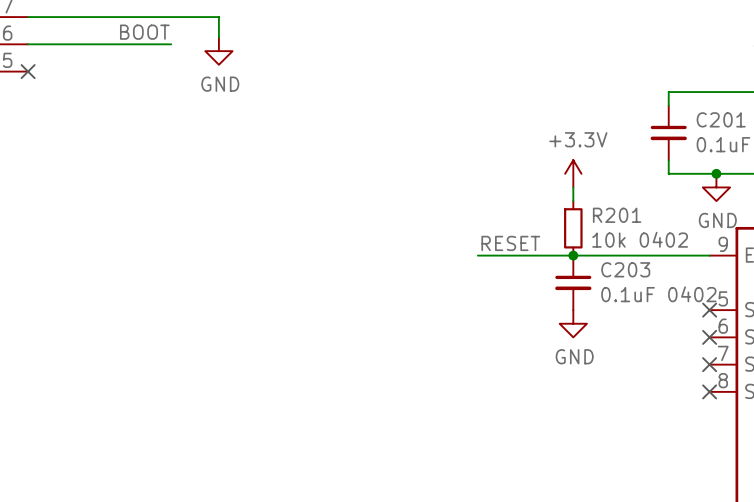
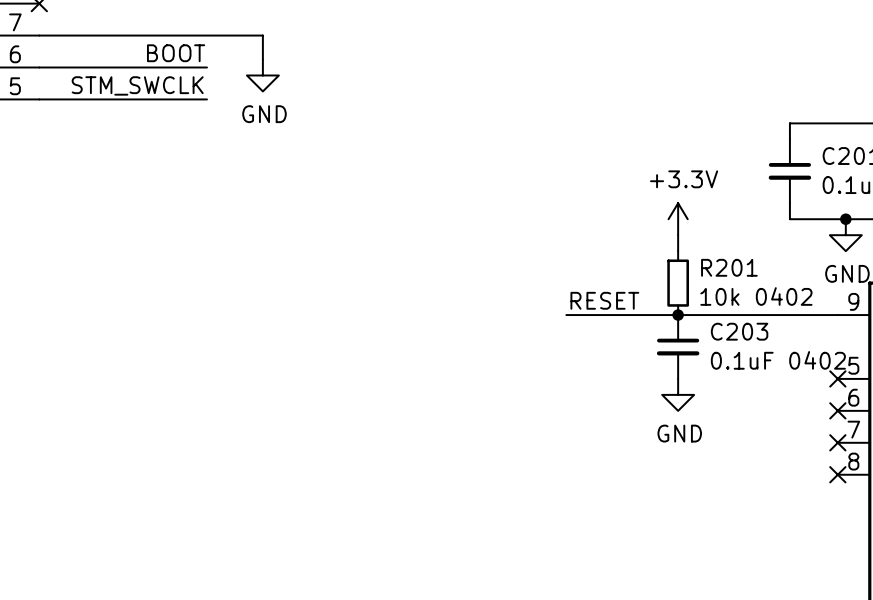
label: none -> STM_SWCLK (137, 85)
wire: none -> (39, 99) (207, 99)
no-connect mark: (28, 71) -> none

